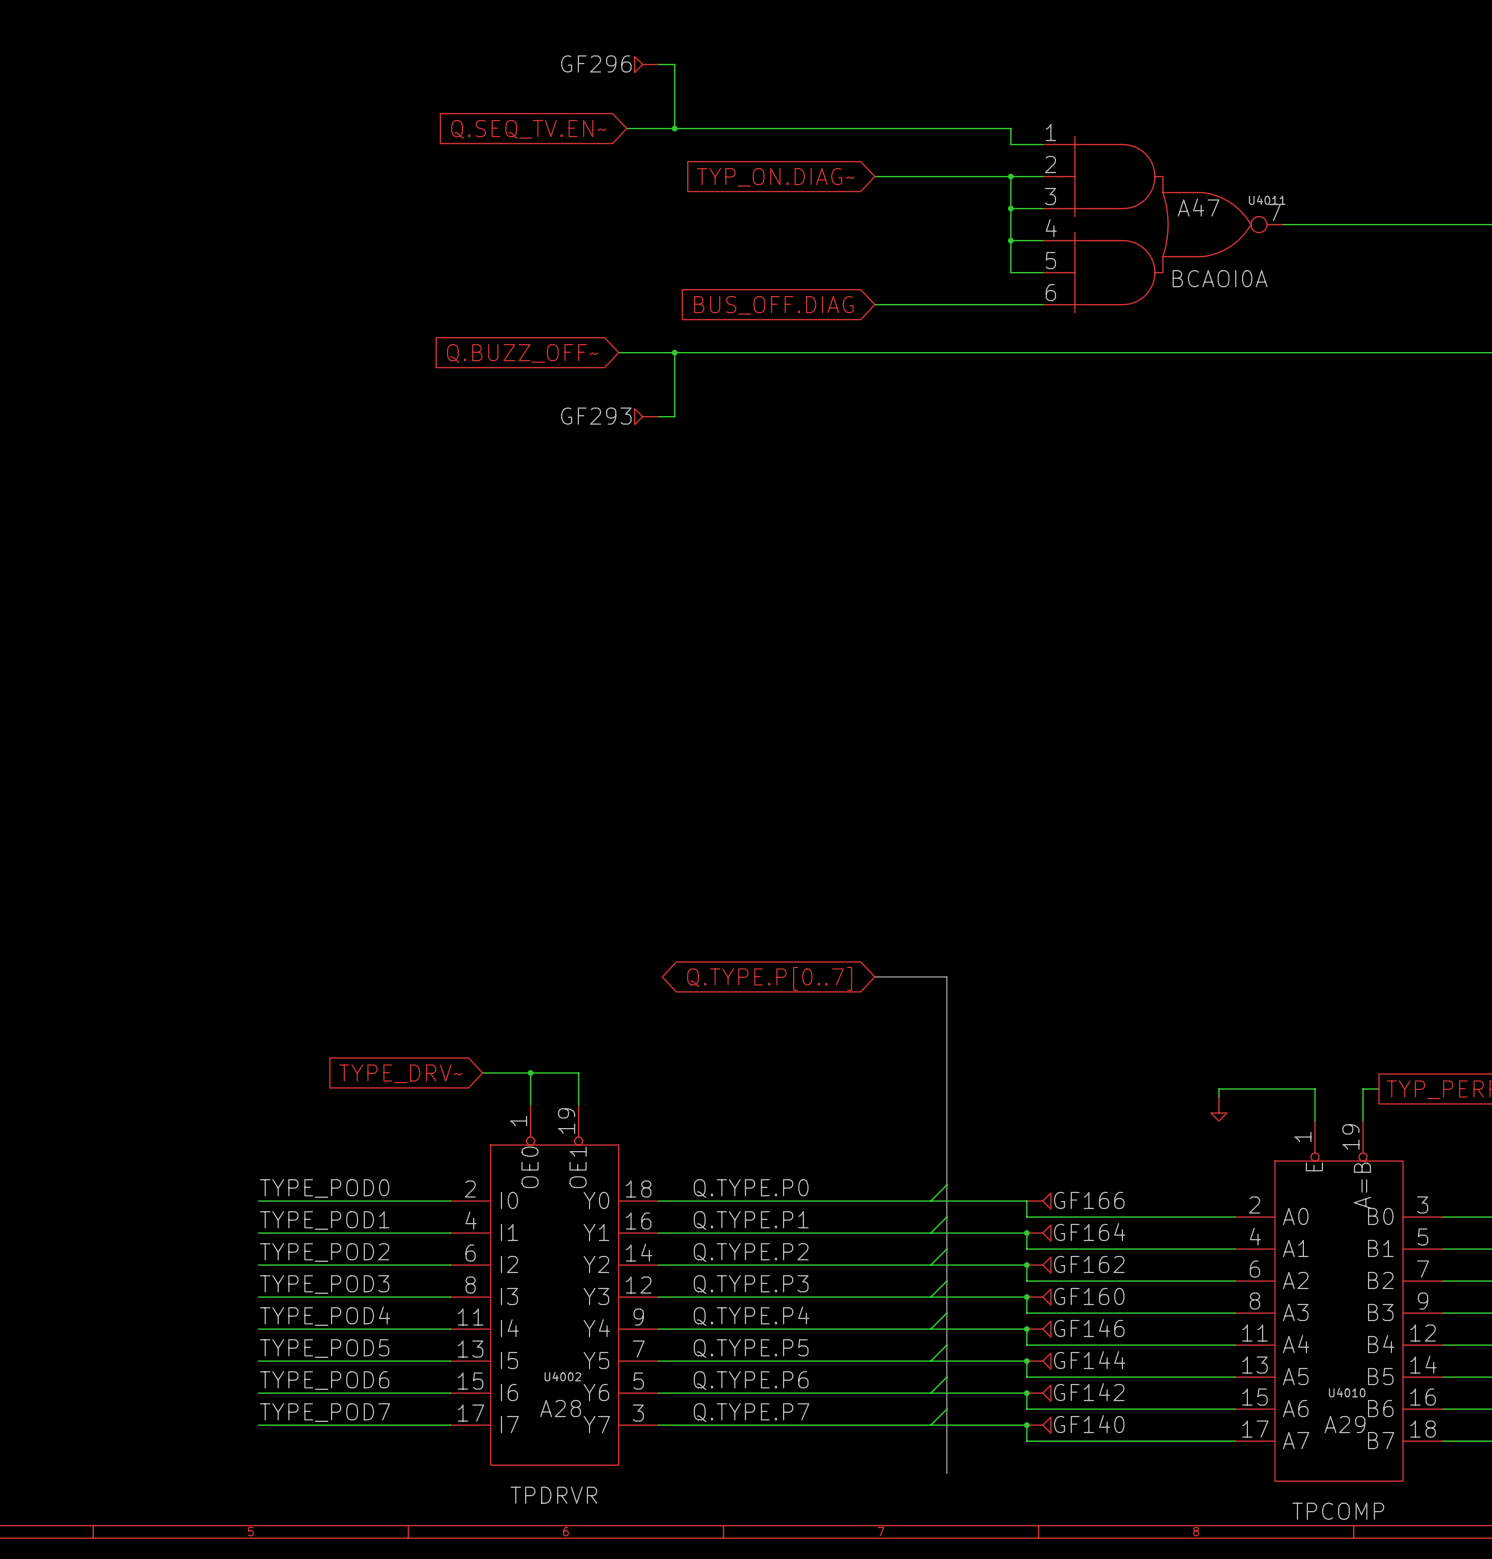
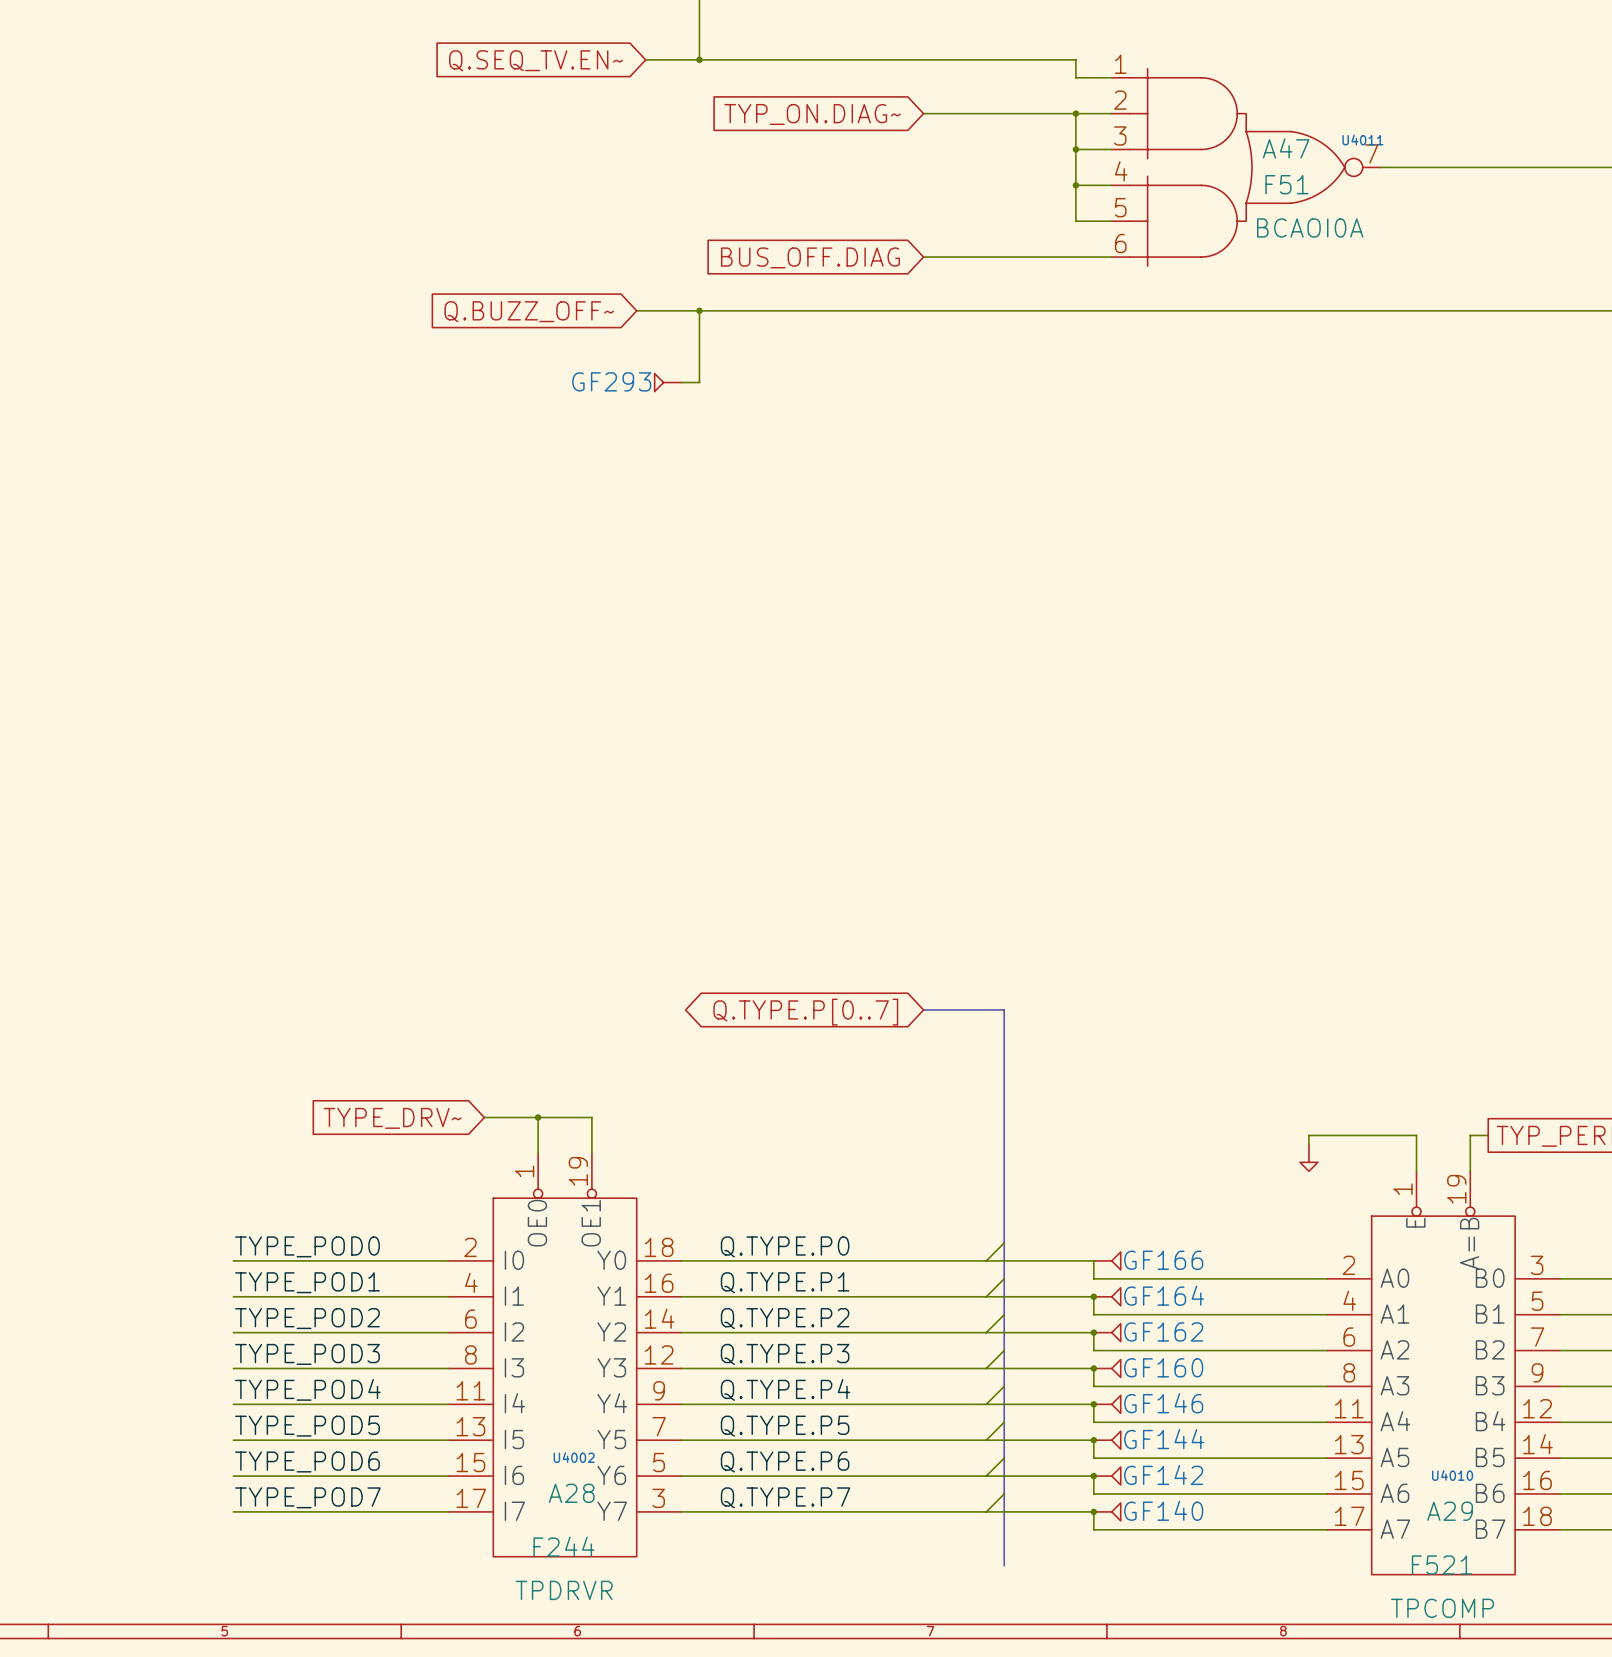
U4011 value: none -> F51 (1286, 184)
U4002 value: none -> F244 (564, 1546)
U4010 value: none -> F521 (1441, 1565)

